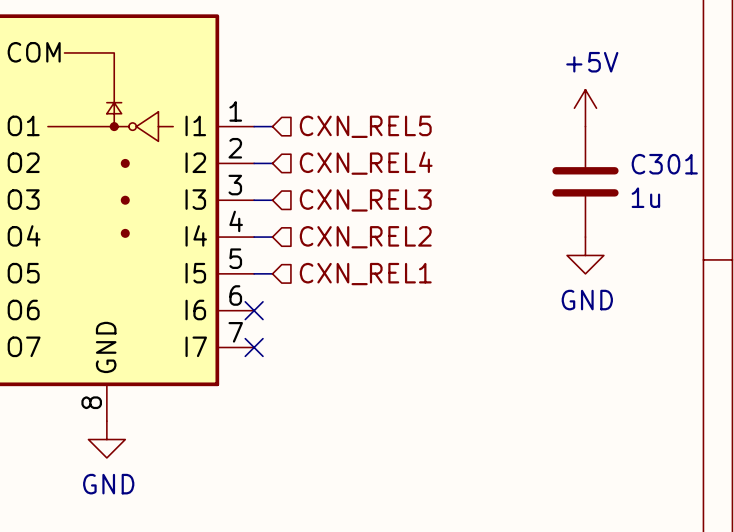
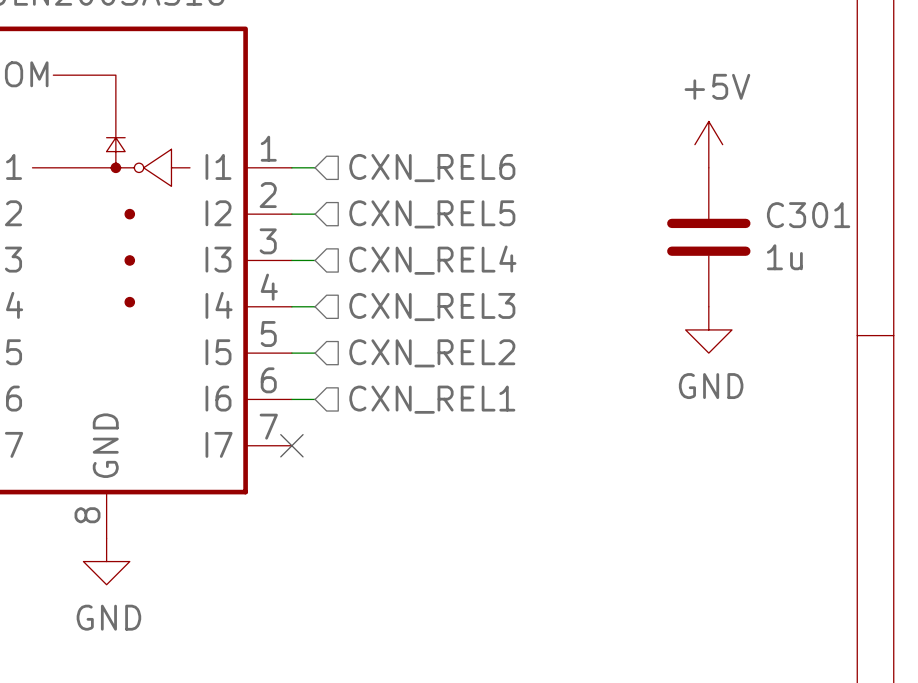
hierarchical label: CXN_REL5 (365, 126) -> CXN_REL6 (432, 168)
hierarchical label: CXN_REL4 (366, 163) -> CXN_REL5 (432, 214)
hierarchical label: CXN_REL3 (365, 200) -> CXN_REL4 (432, 260)
hierarchical label: CXN_REL2 (365, 237) -> CXN_REL3 (432, 307)
hierarchical label: CXN_REL1 (365, 274) -> CXN_REL2 (432, 353)
wire: none -> (291, 399) (315, 399)
no-connect mark: (254, 310) -> none
hierarchical label: none -> CXN_REL1 (432, 399)

